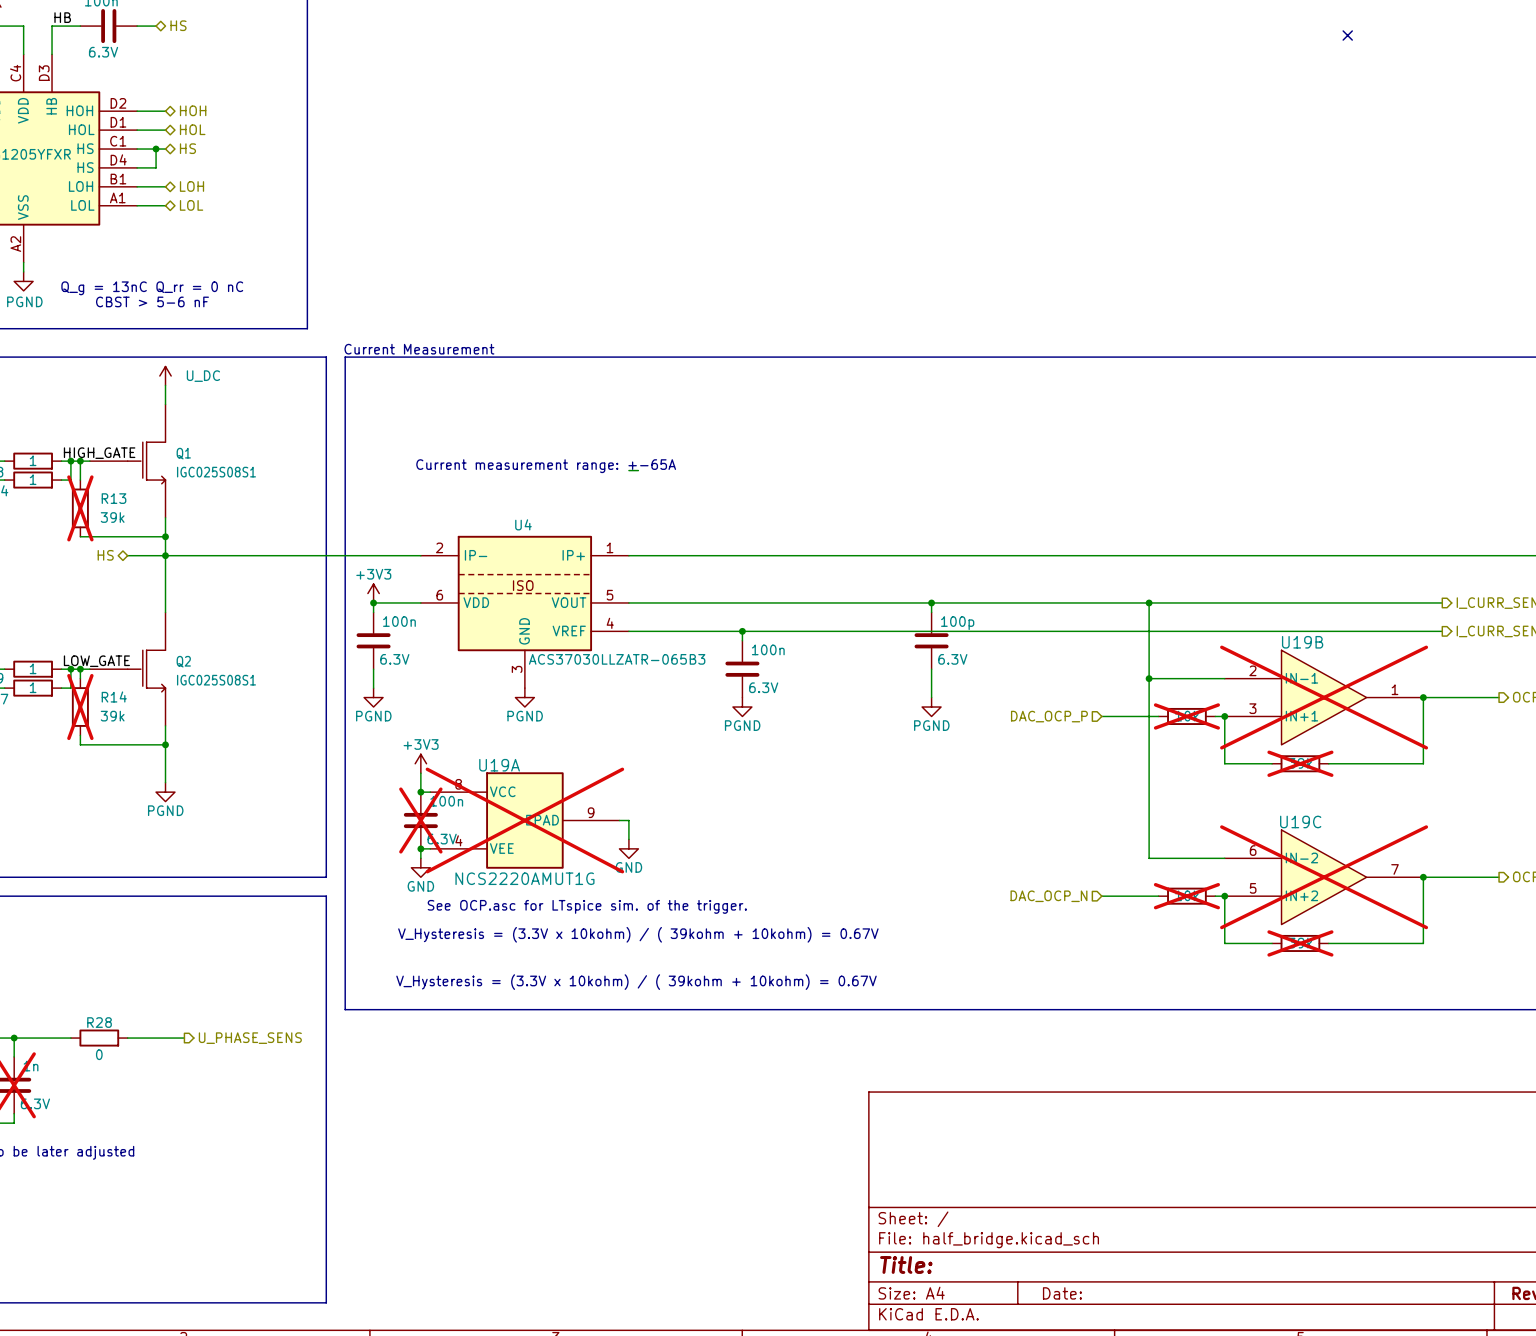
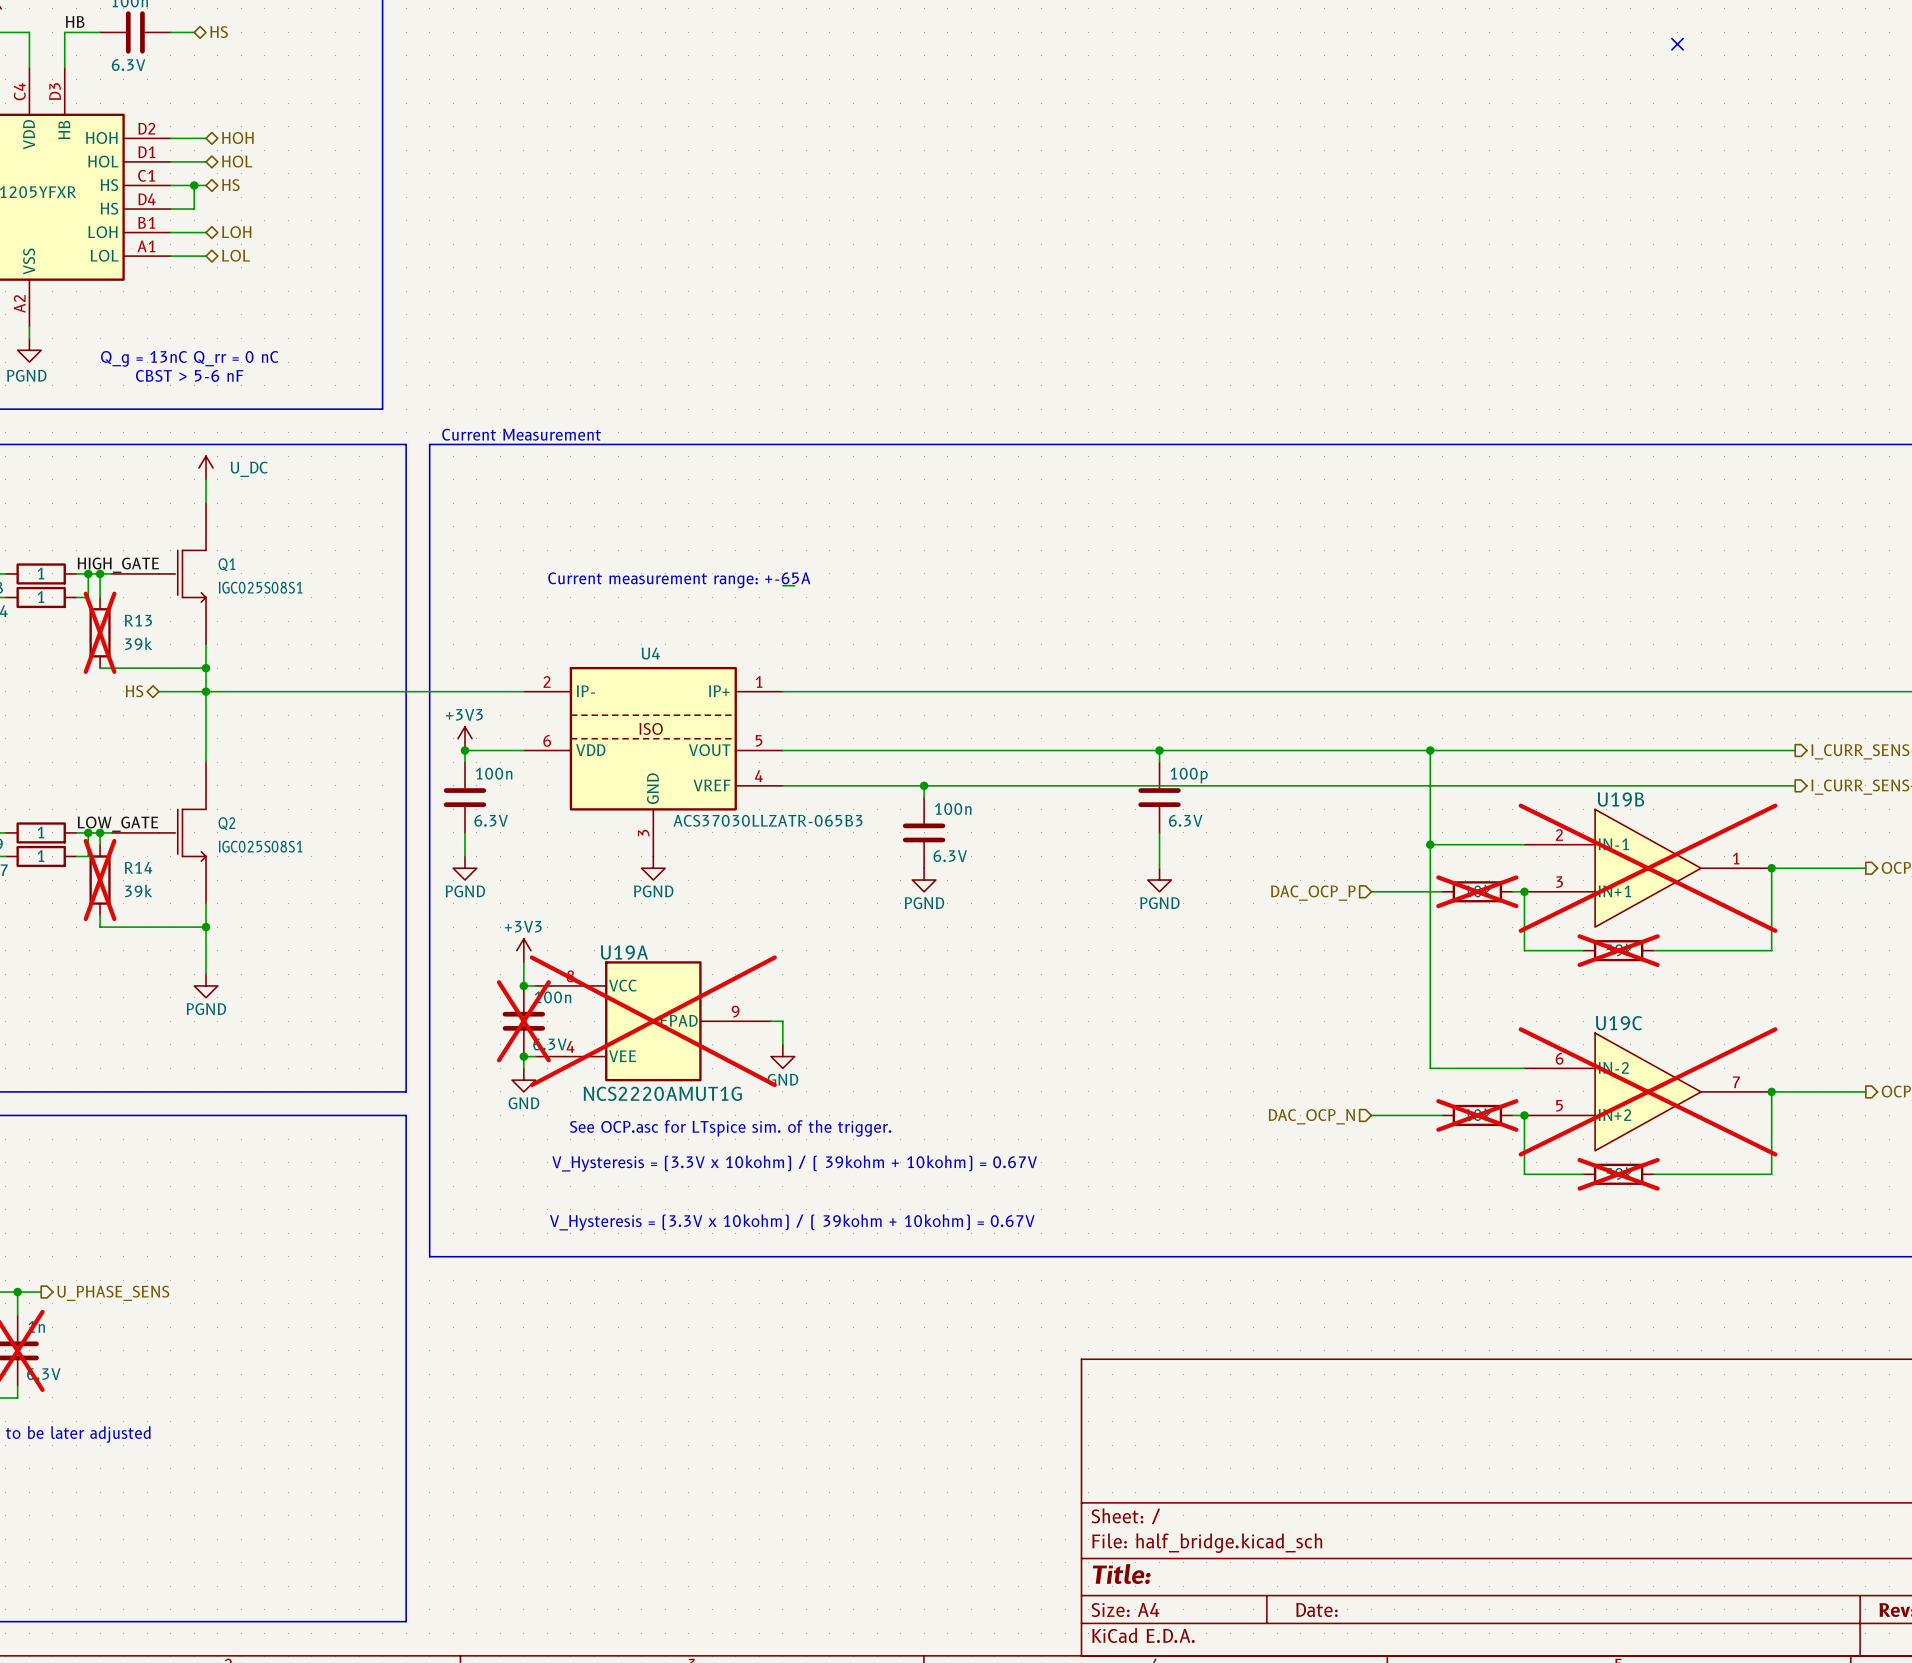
wire: (33, 1038) (70, 1038) -> none
R28: (99, 1038) -> none
wire: (127, 1038) (184, 1038) -> none
hierarchical label position: U_PHASE_SENS (250, 1038) -> U_PHASE_SENS (113, 1293)

